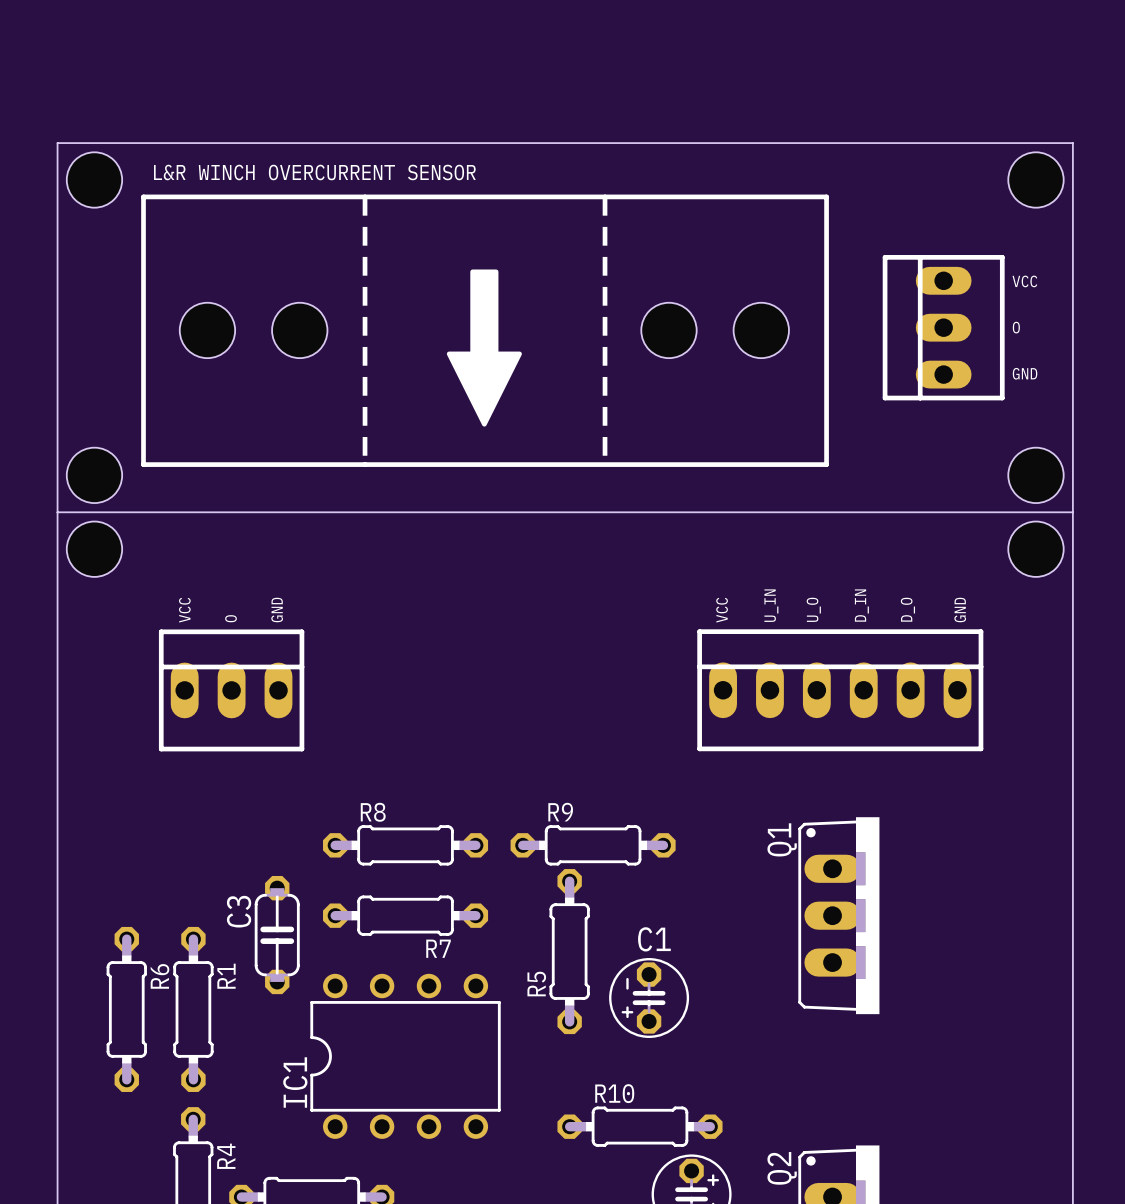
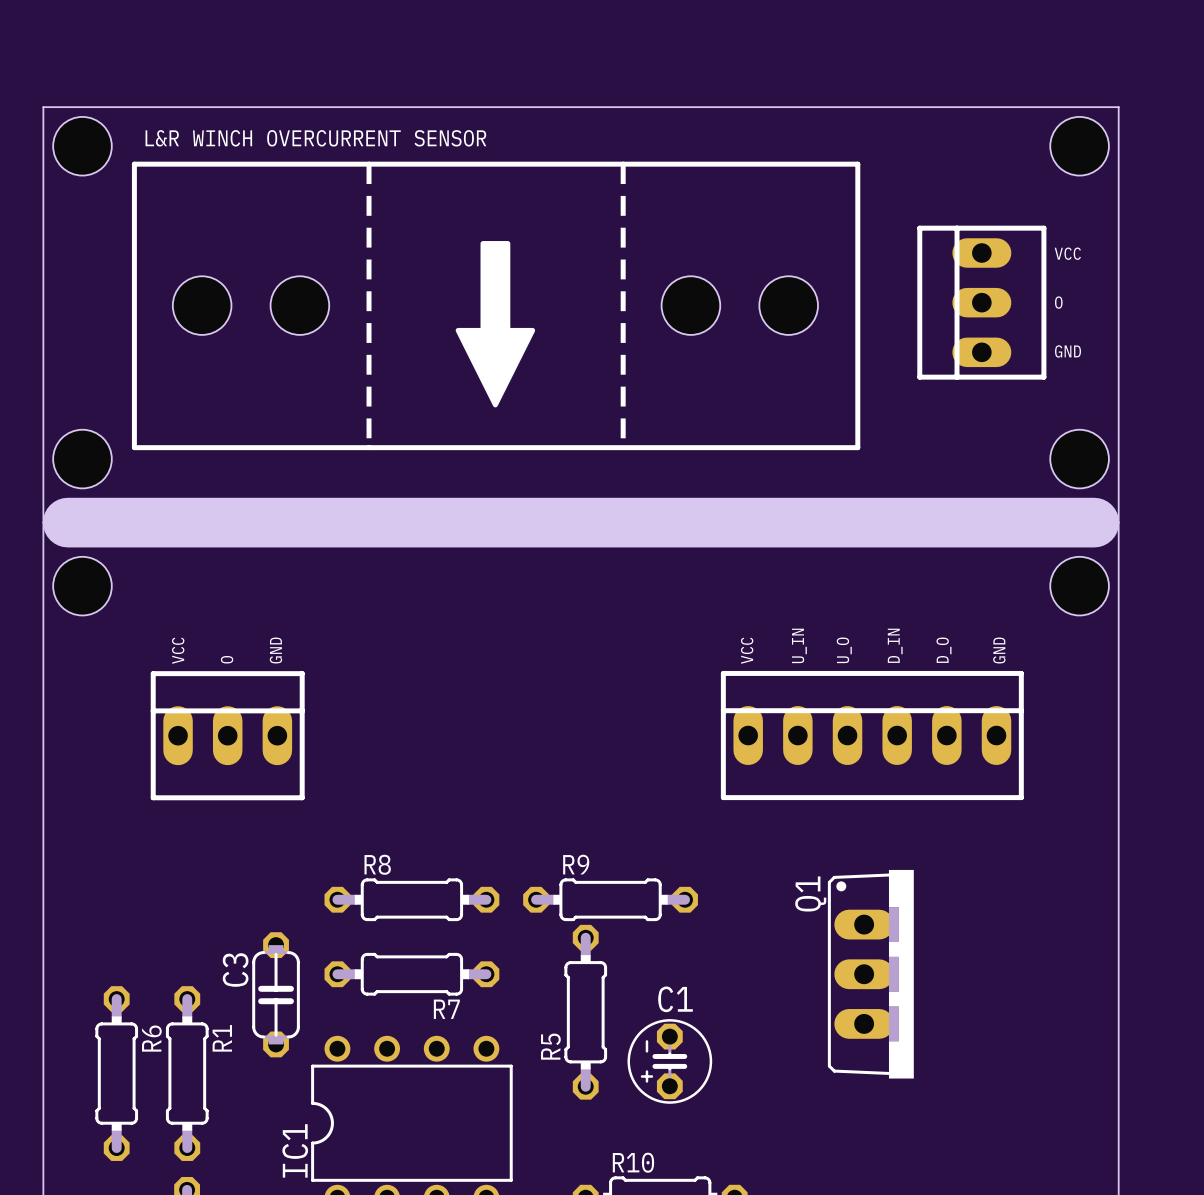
board edge: (57, 143) (1072, 143) -> (43, 156) (43, 107) (1118, 107) (1118, 156)
text position: L&R WINCH OVERCURRENT SENSOR (314, 172) -> L&R WINCH OVERCURRENT SENSOR (315, 138)
hole position: (94, 180) -> (82, 146)
hole position: (1035, 180) -> (1079, 146)
text: none -> VCC (1067, 253)
text: VCC (1024, 281) -> O (1058, 302)
part position: (943, 327) -> (981, 302)
text: O (1016, 327) -> GND (1068, 351)
part position: (485, 330) -> (496, 305)
text: GND (1025, 373) -> none
hole position: (94, 475) -> (82, 459)
hole position: (1035, 475) -> (1079, 459)
board edge: none -> (67, 522) (1094, 522)
board edge: (57, 512) (1072, 512) -> none

